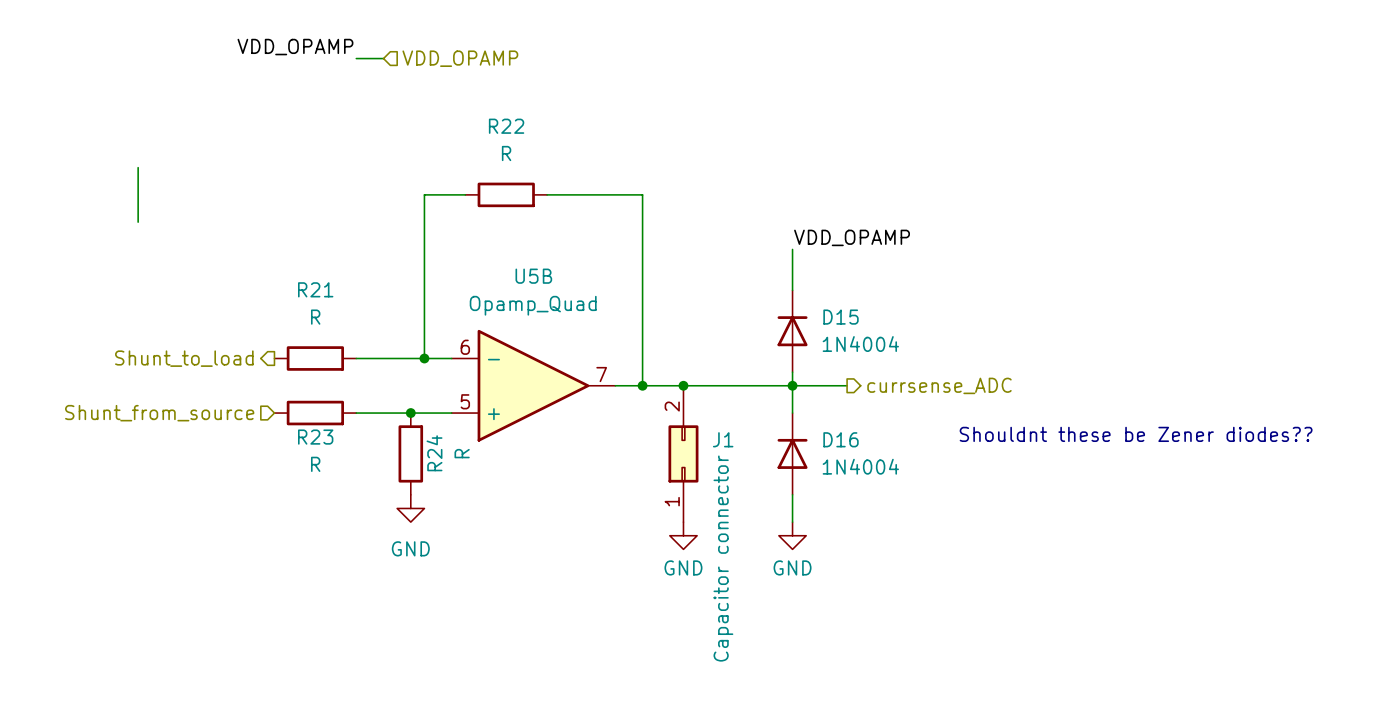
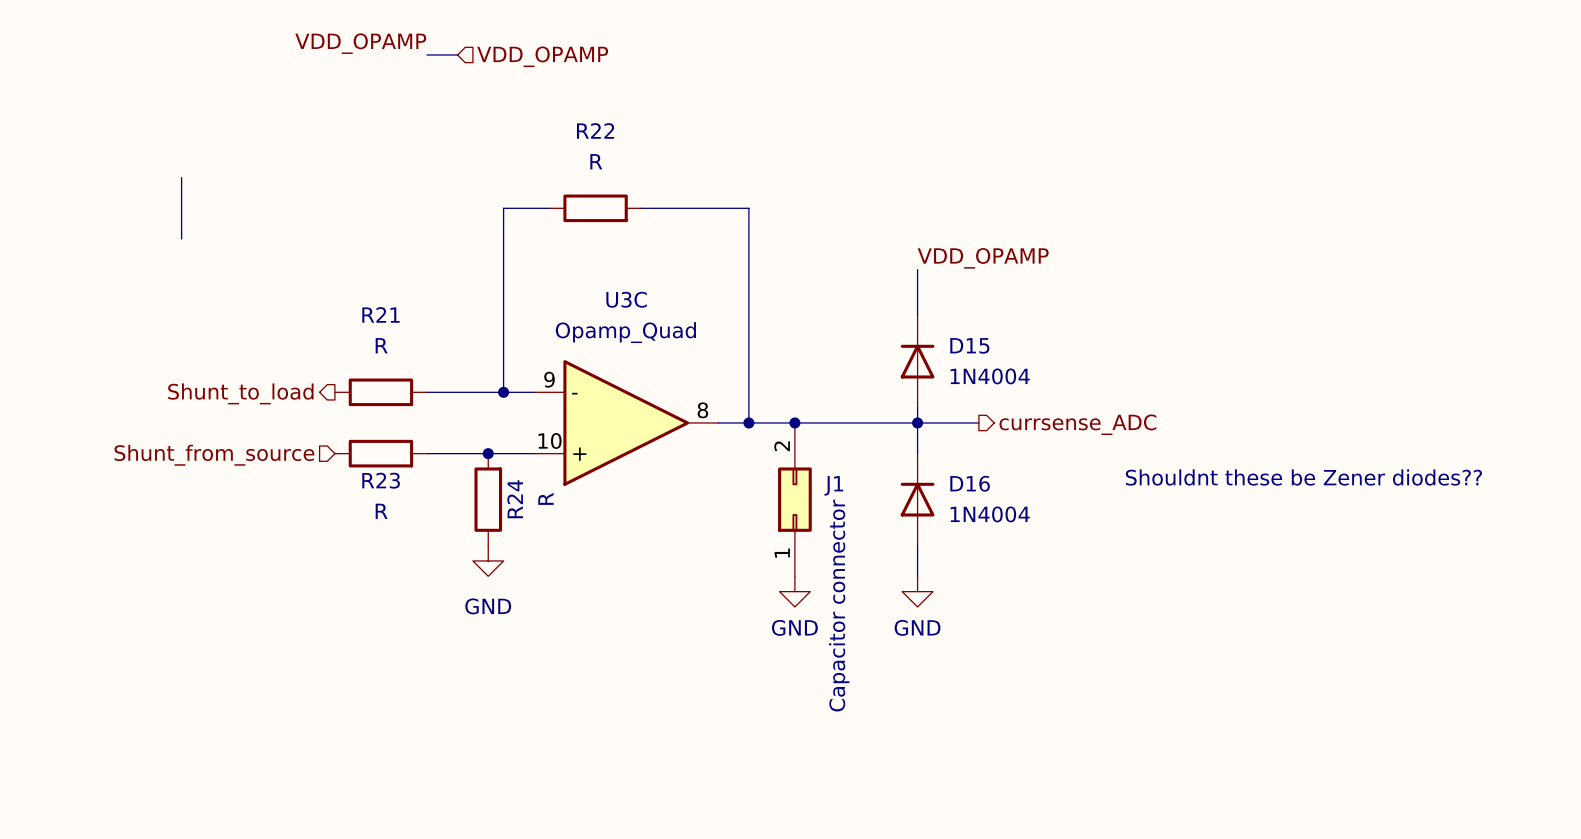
U5B name: U5B (533, 276) -> U3C (626, 299)
U5B pin number: 6 (465, 347) -> 9 (549, 379)
U5B pin number: 7 (601, 374) -> 8 (702, 410)
U5B pin number: 5 (465, 401) -> 10 (550, 441)

